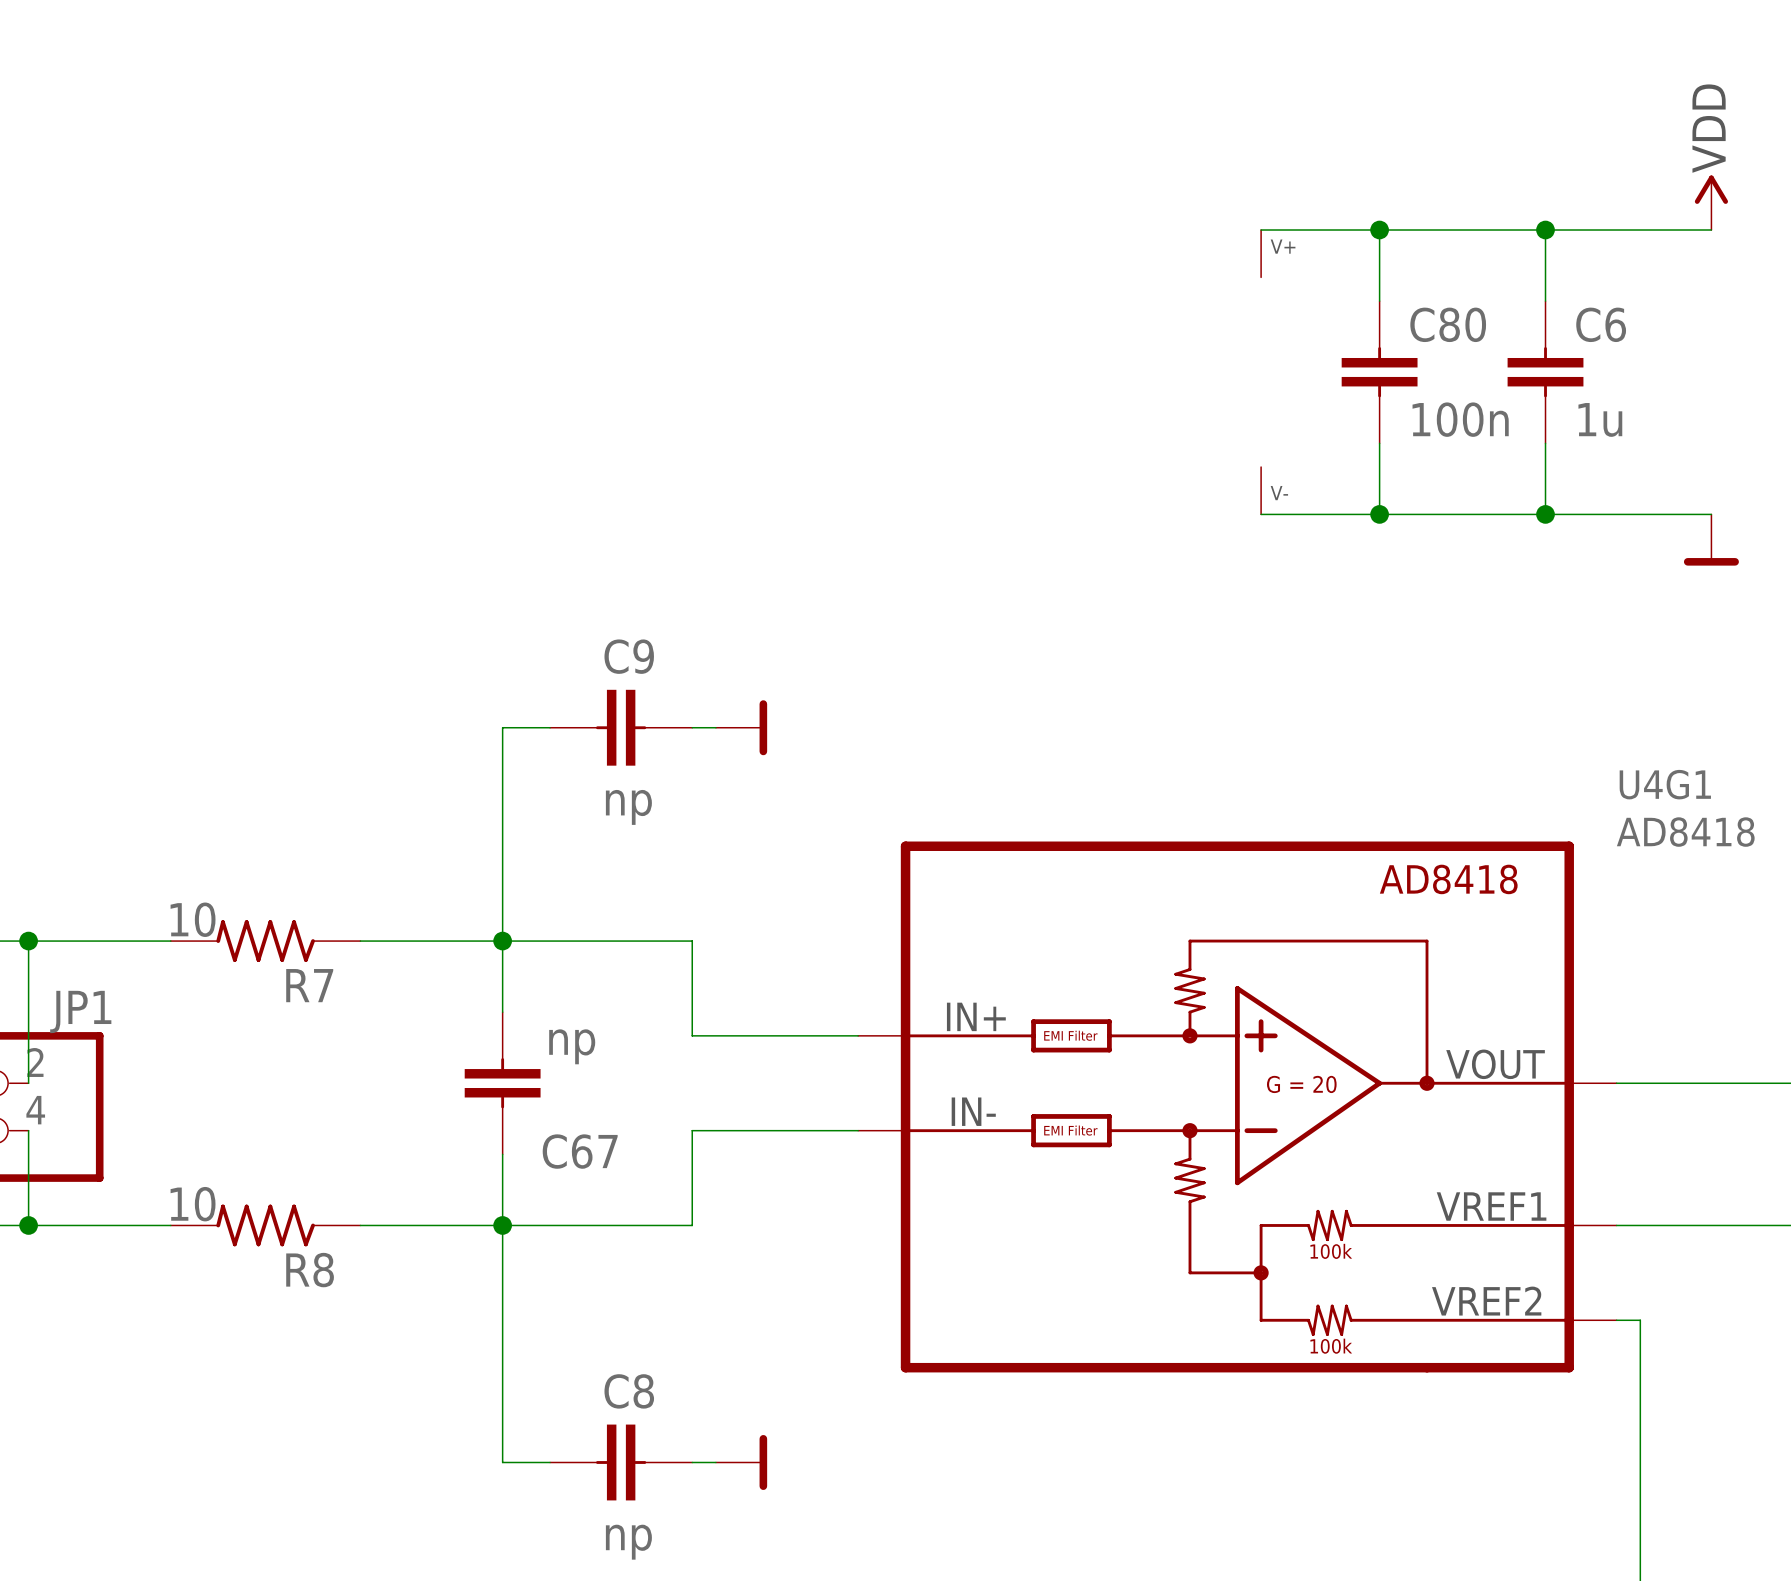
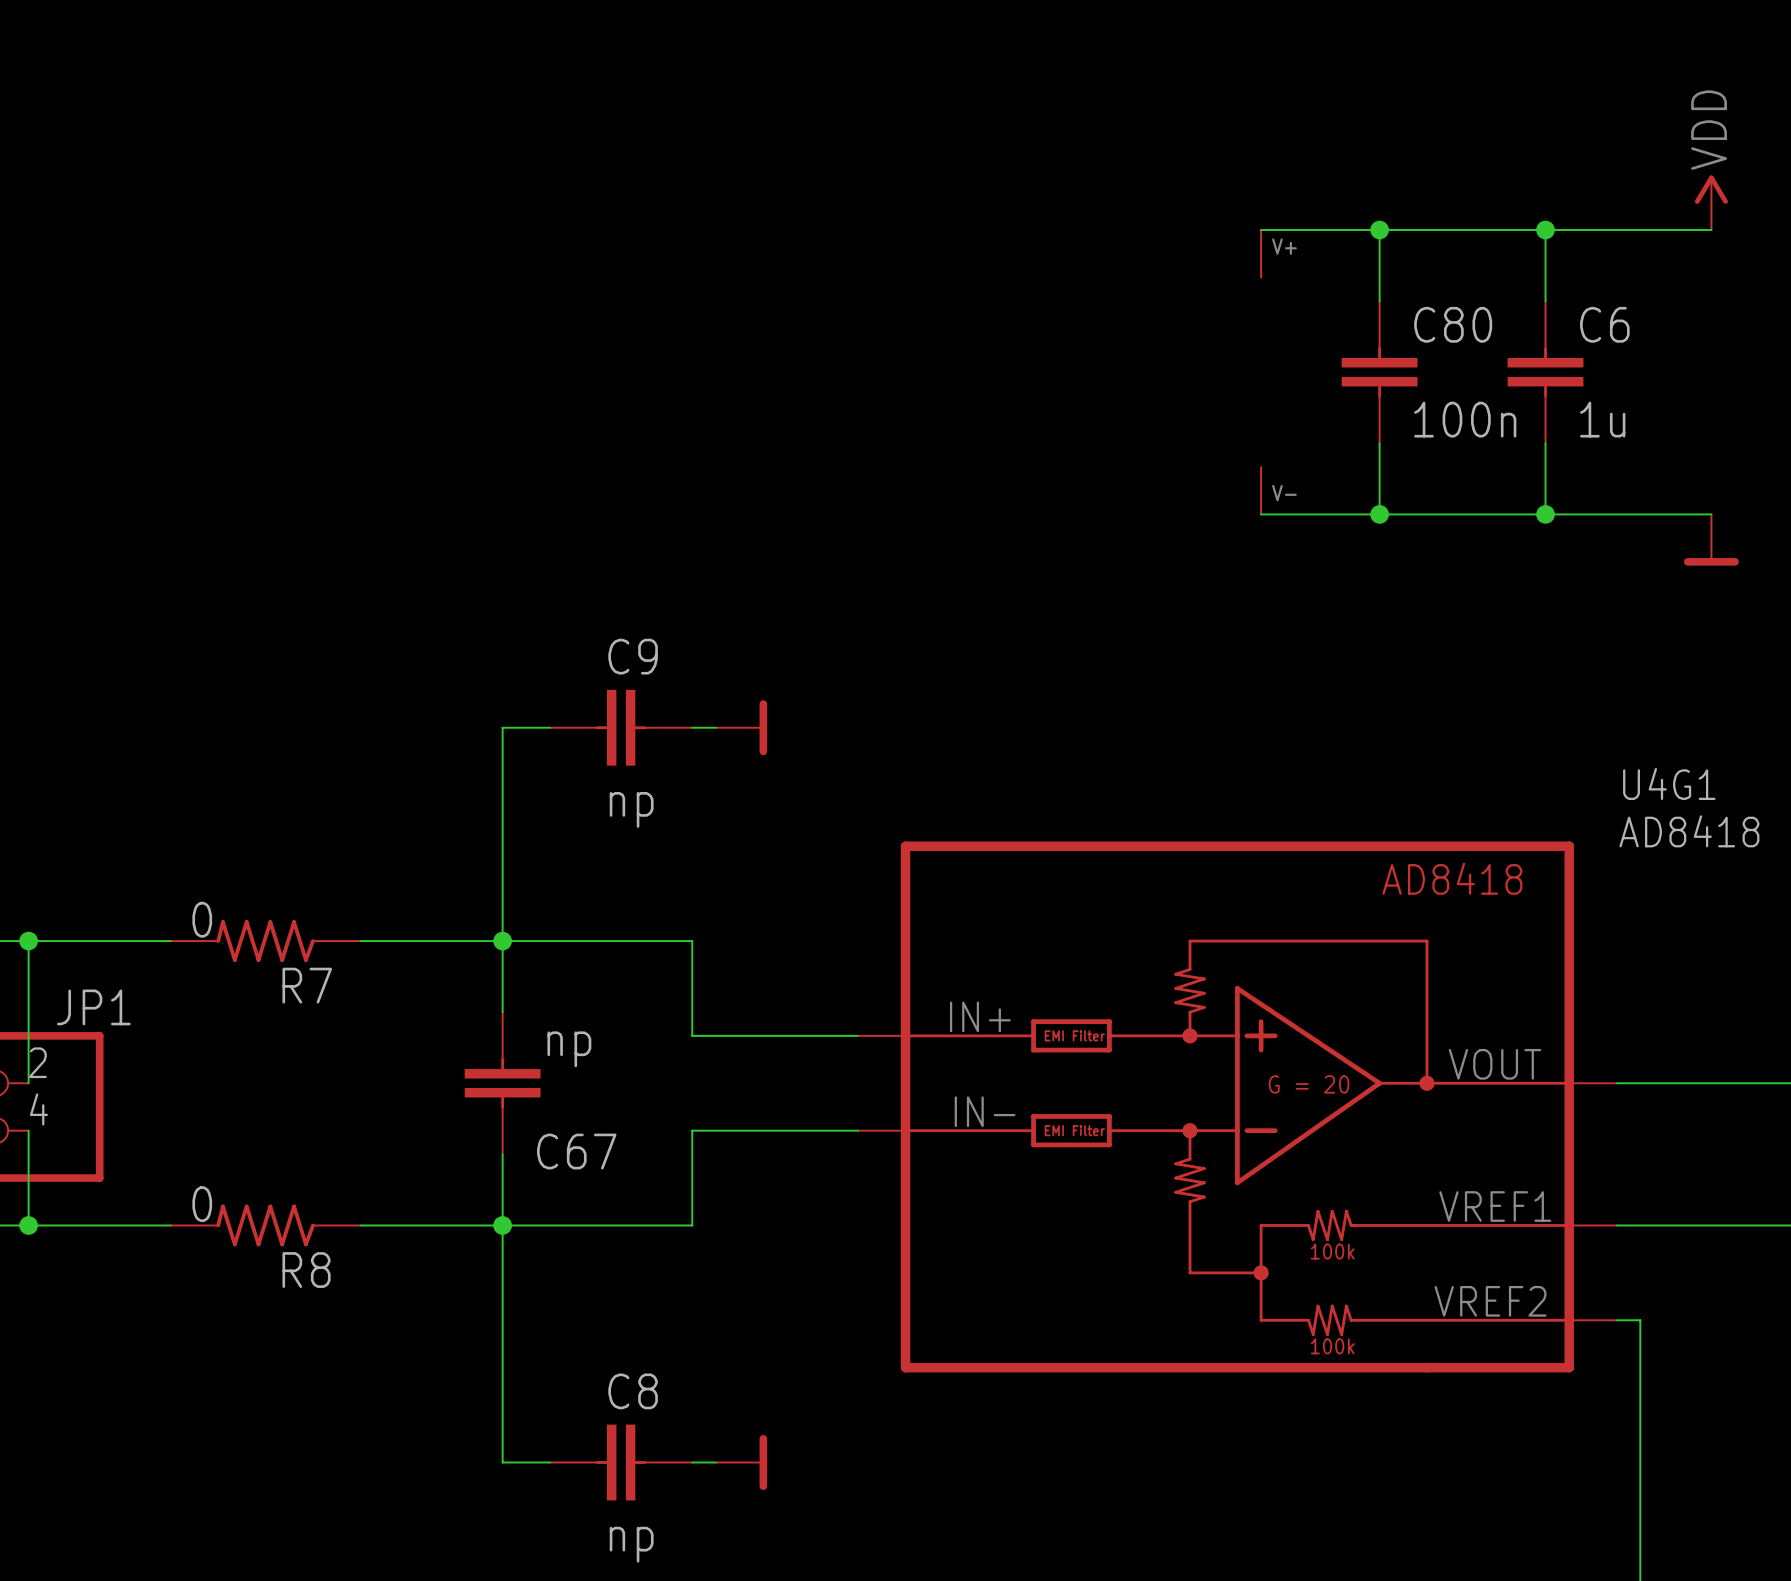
R7 value: 10 (193, 919) -> 0 (202, 919)
R8 value: 10 (193, 1204) -> 0 (202, 1204)

